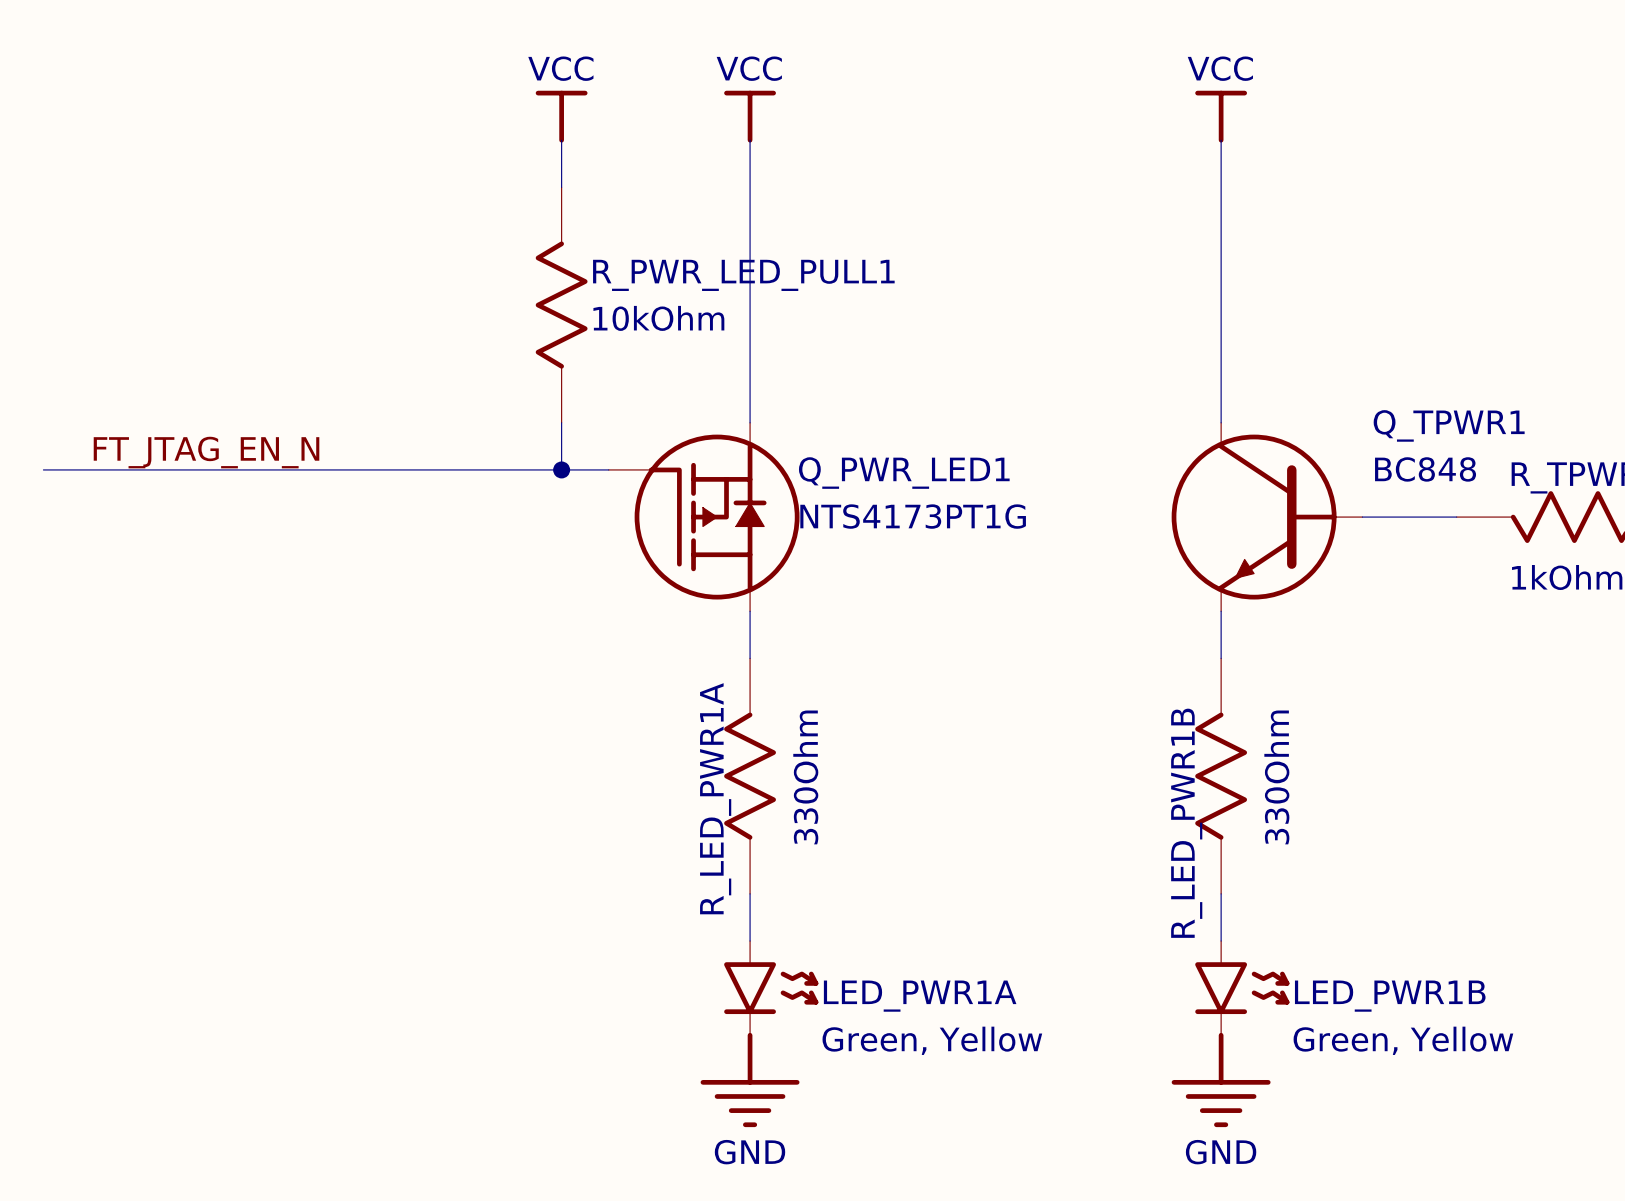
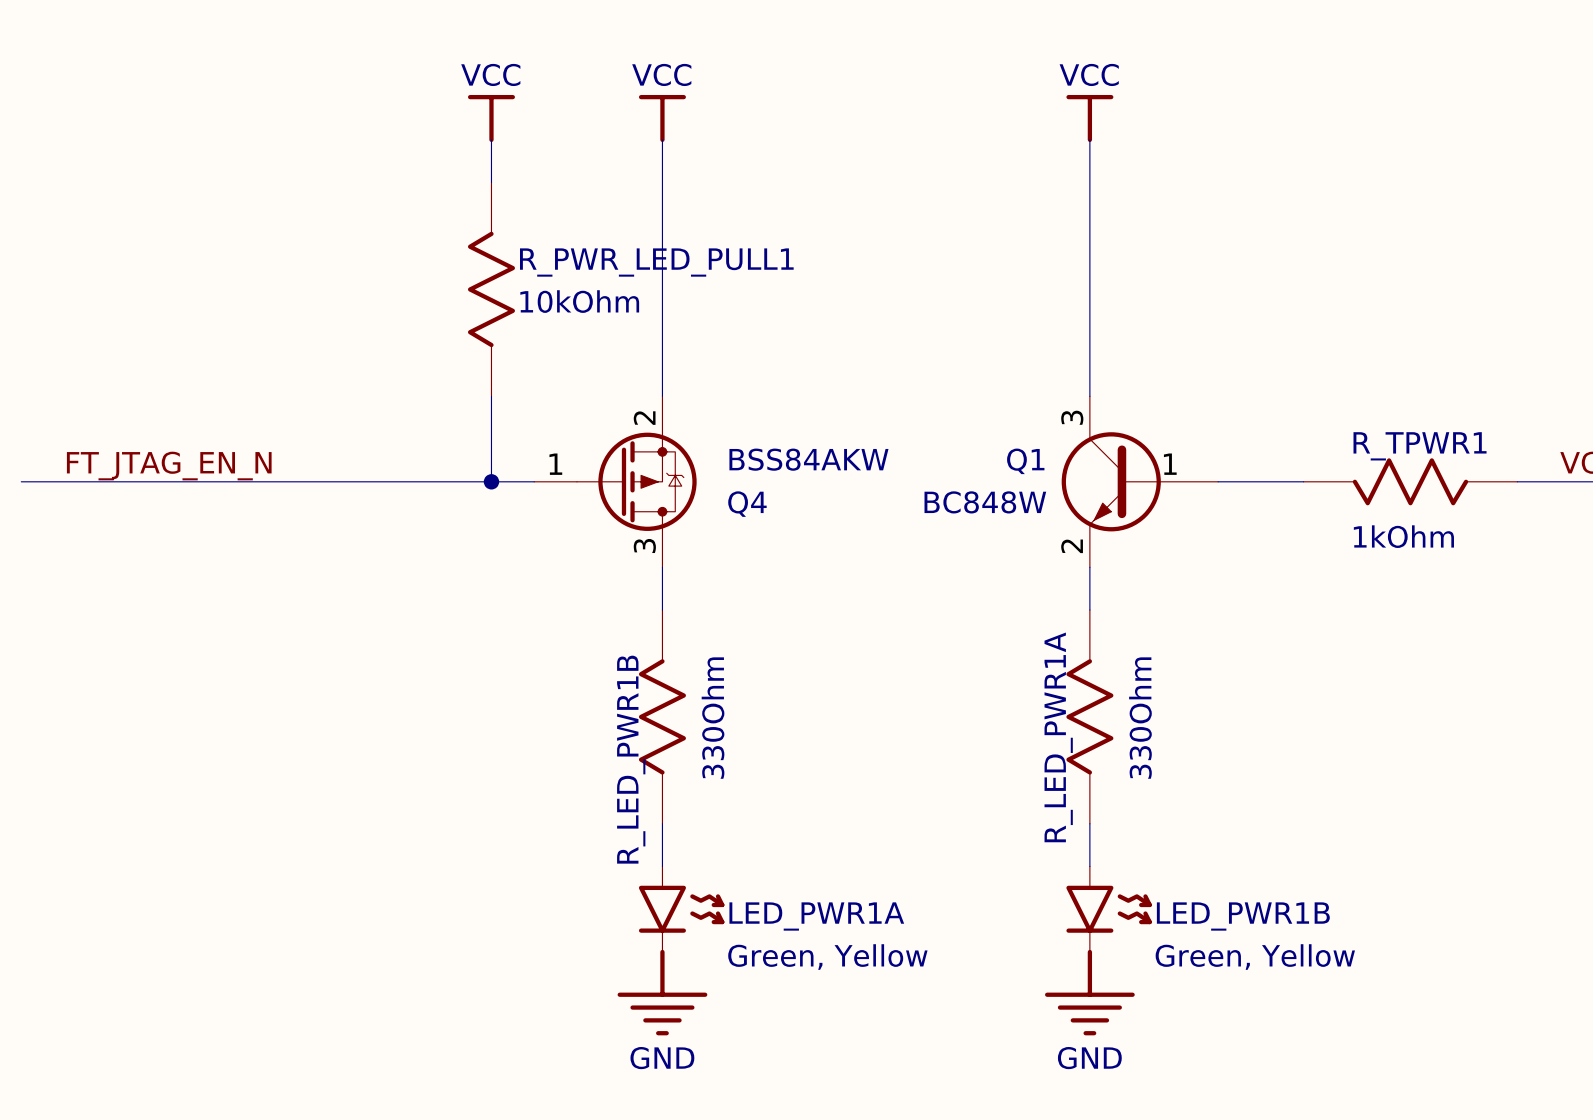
label position: FT_JTAG_EN_N (206, 452) -> FT_JTAG_EN_N (169, 466)
wire: (43, 469) (608, 469) -> (21, 481) (534, 481)
wire: none -> (491, 439) (491, 481)
junction position: (561, 469) -> (491, 481)
Q4: none -> BSS84AKW (615, 481)
Q_PWR_LED1: (704, 517) -> none
Q_TPWR1: (1267, 517) -> none
Q1: none -> BC848W (1139, 481)
R_LED_PWR1A name: R_LED_PWR1A (715, 798) -> R_LED_PWR1B (631, 759)
R_LED_PWR1B name: R_LED_PWR1B (1186, 823) -> R_LED_PWR1A (1058, 737)

